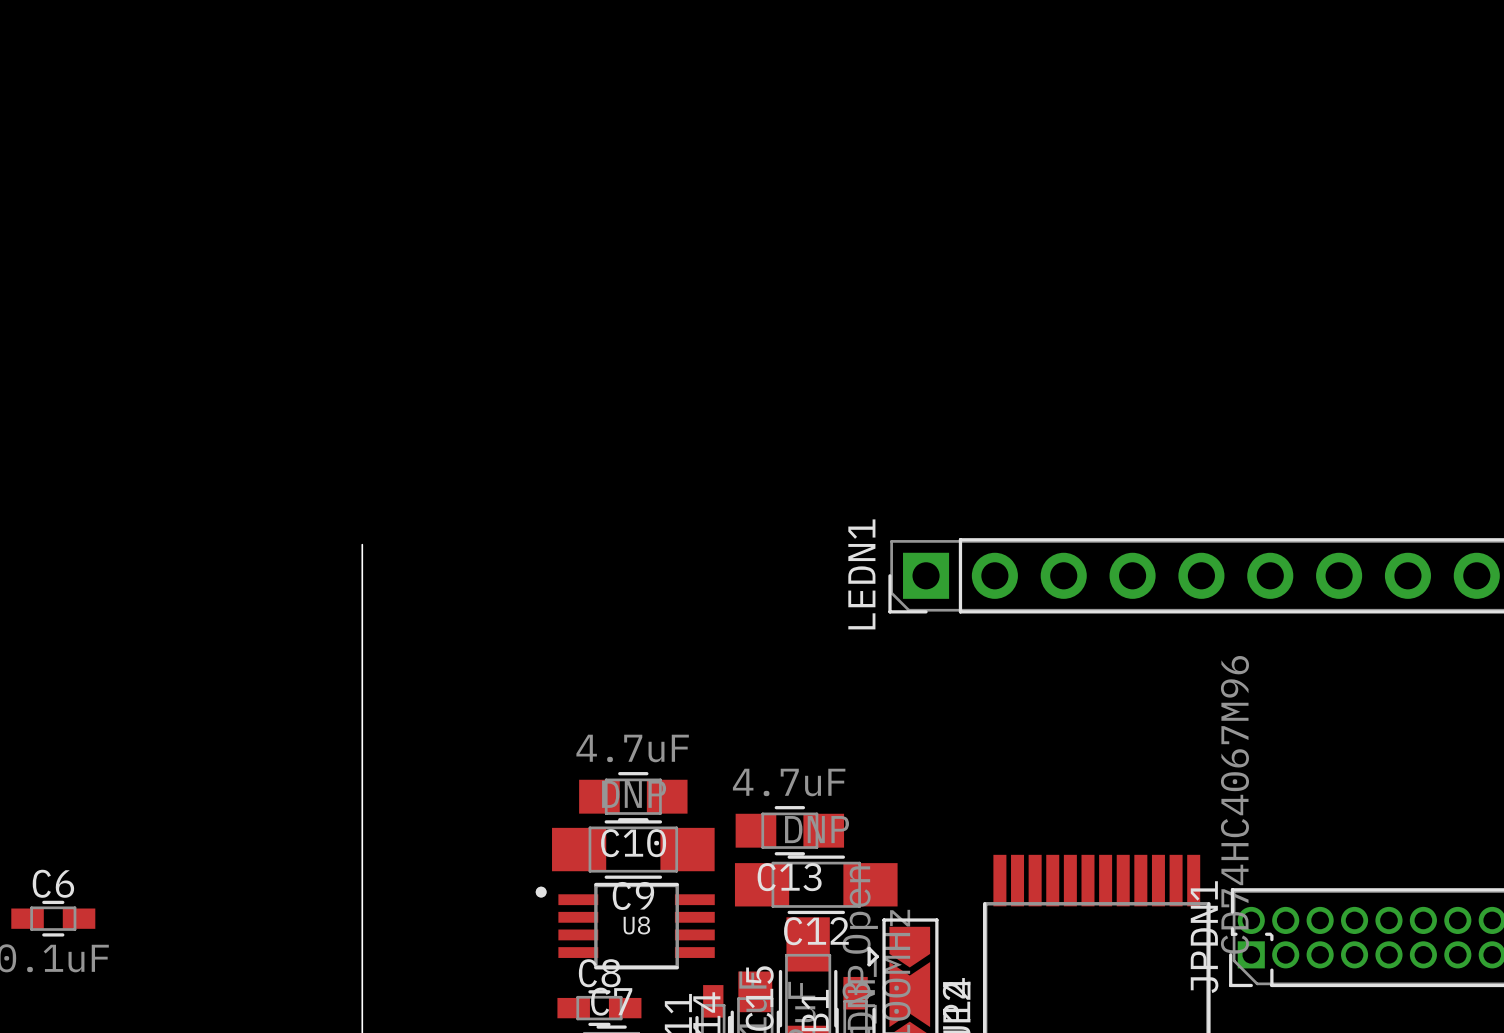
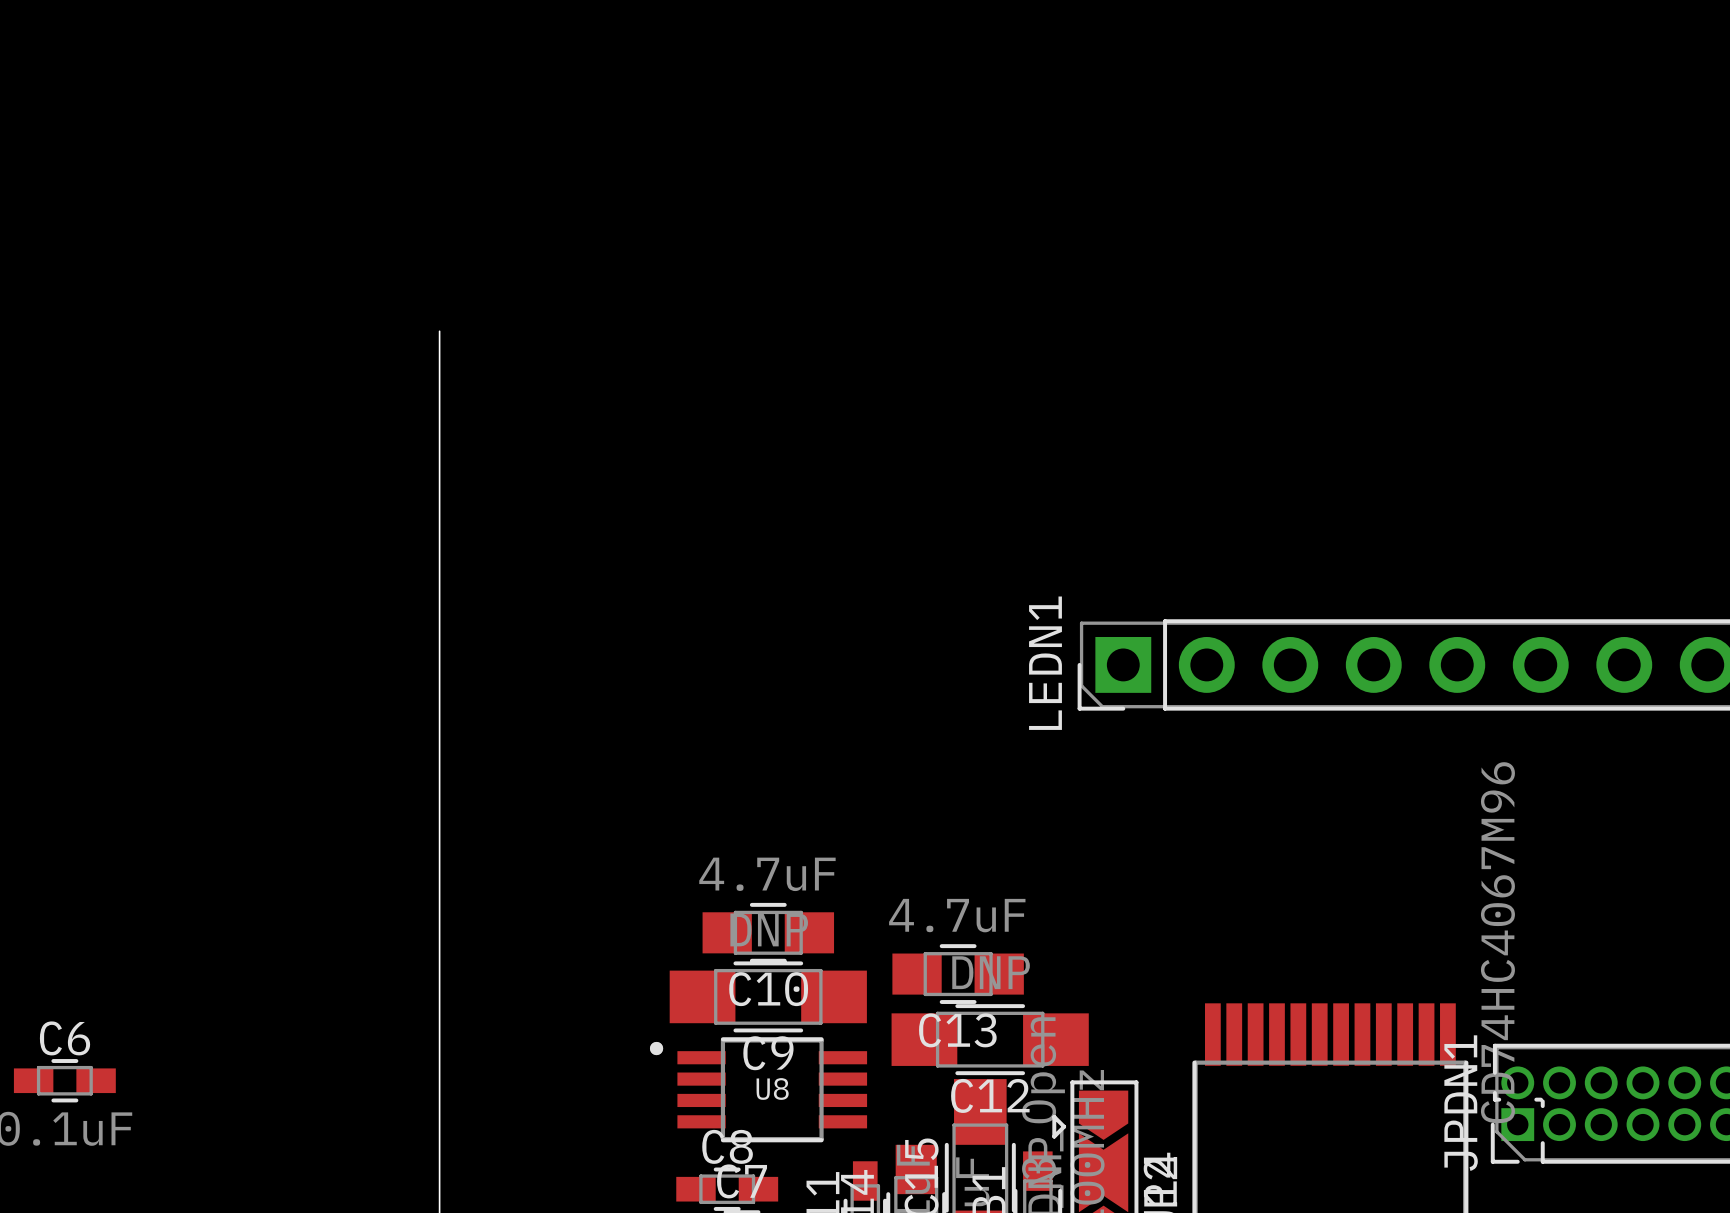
board edge: none -> (439, 331) (439, 627)

